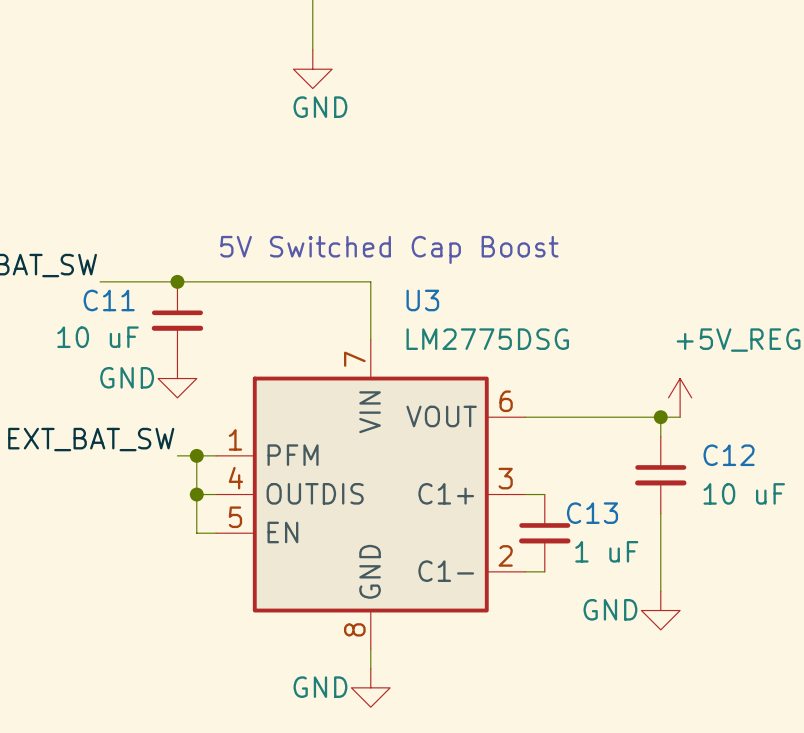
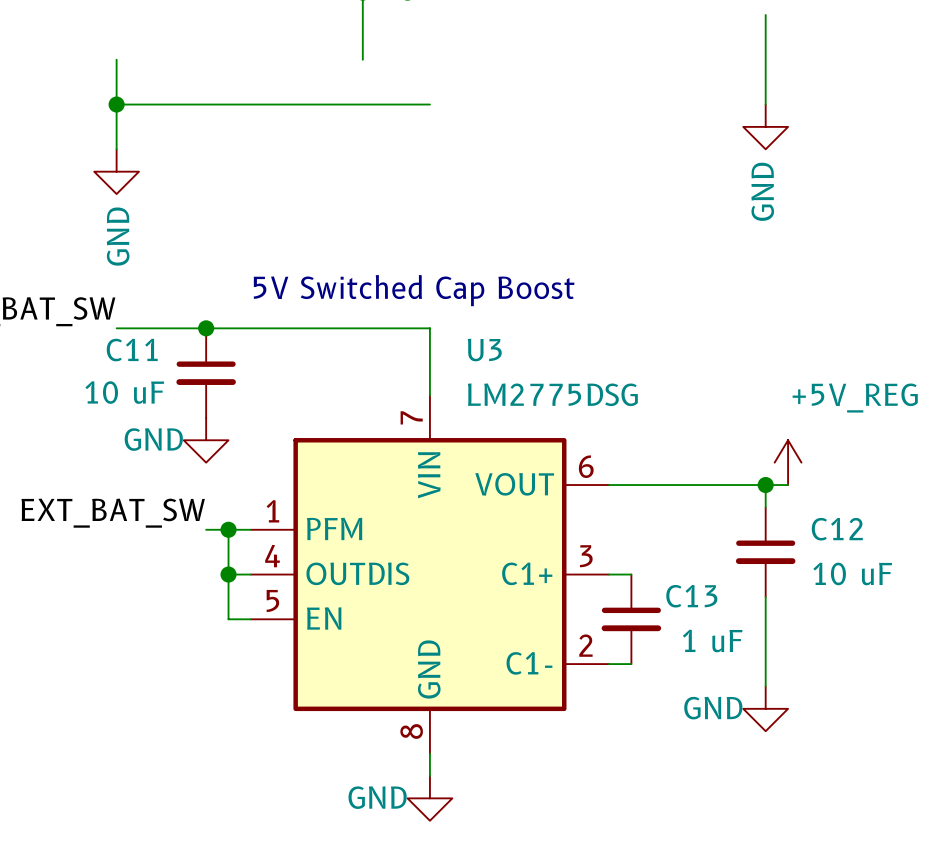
wire: none -> (765, 15) (765, 104)
wire: none -> (116, 59) (116, 149)
power symbol: GND (312, 69) -> none
wire: none -> (116, 104) (429, 104)
junction: none -> (116, 104)
power symbol: none -> GND (765, 126)
power symbol: none -> GND (116, 171)

